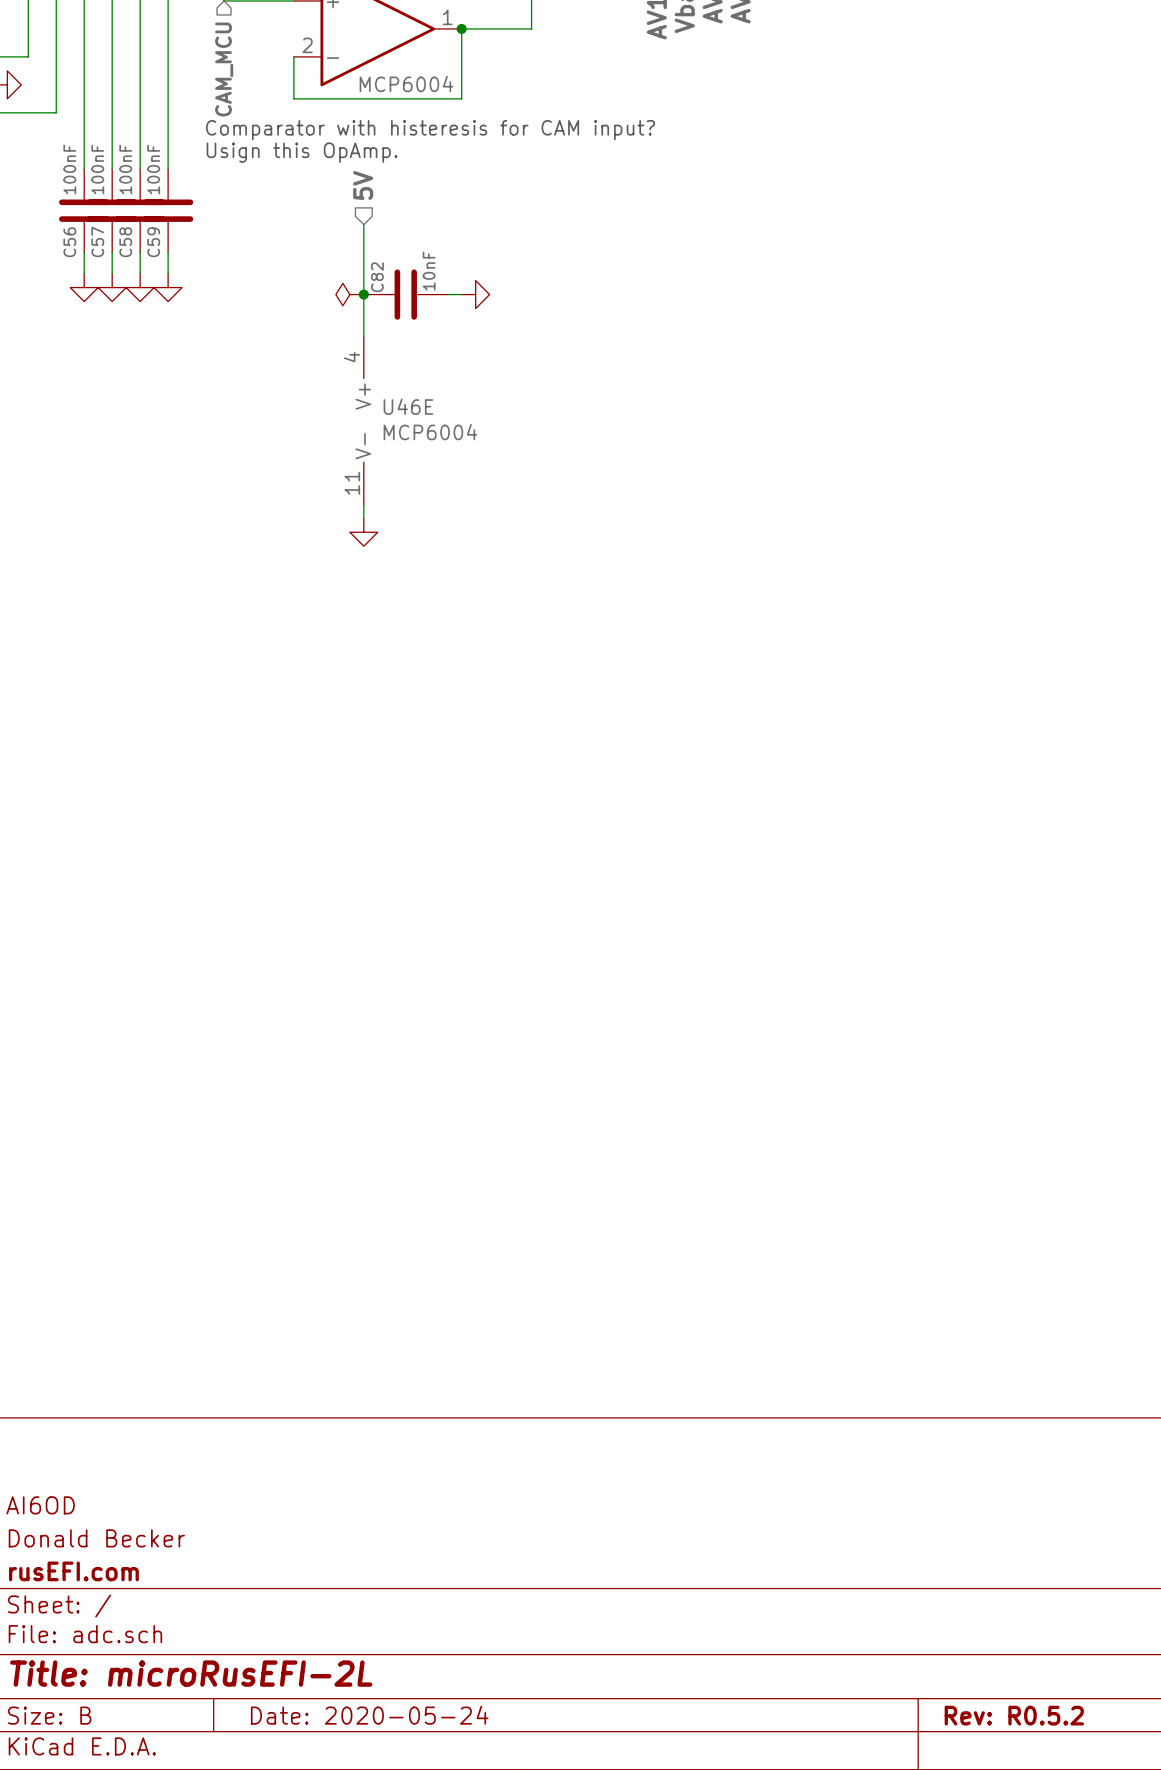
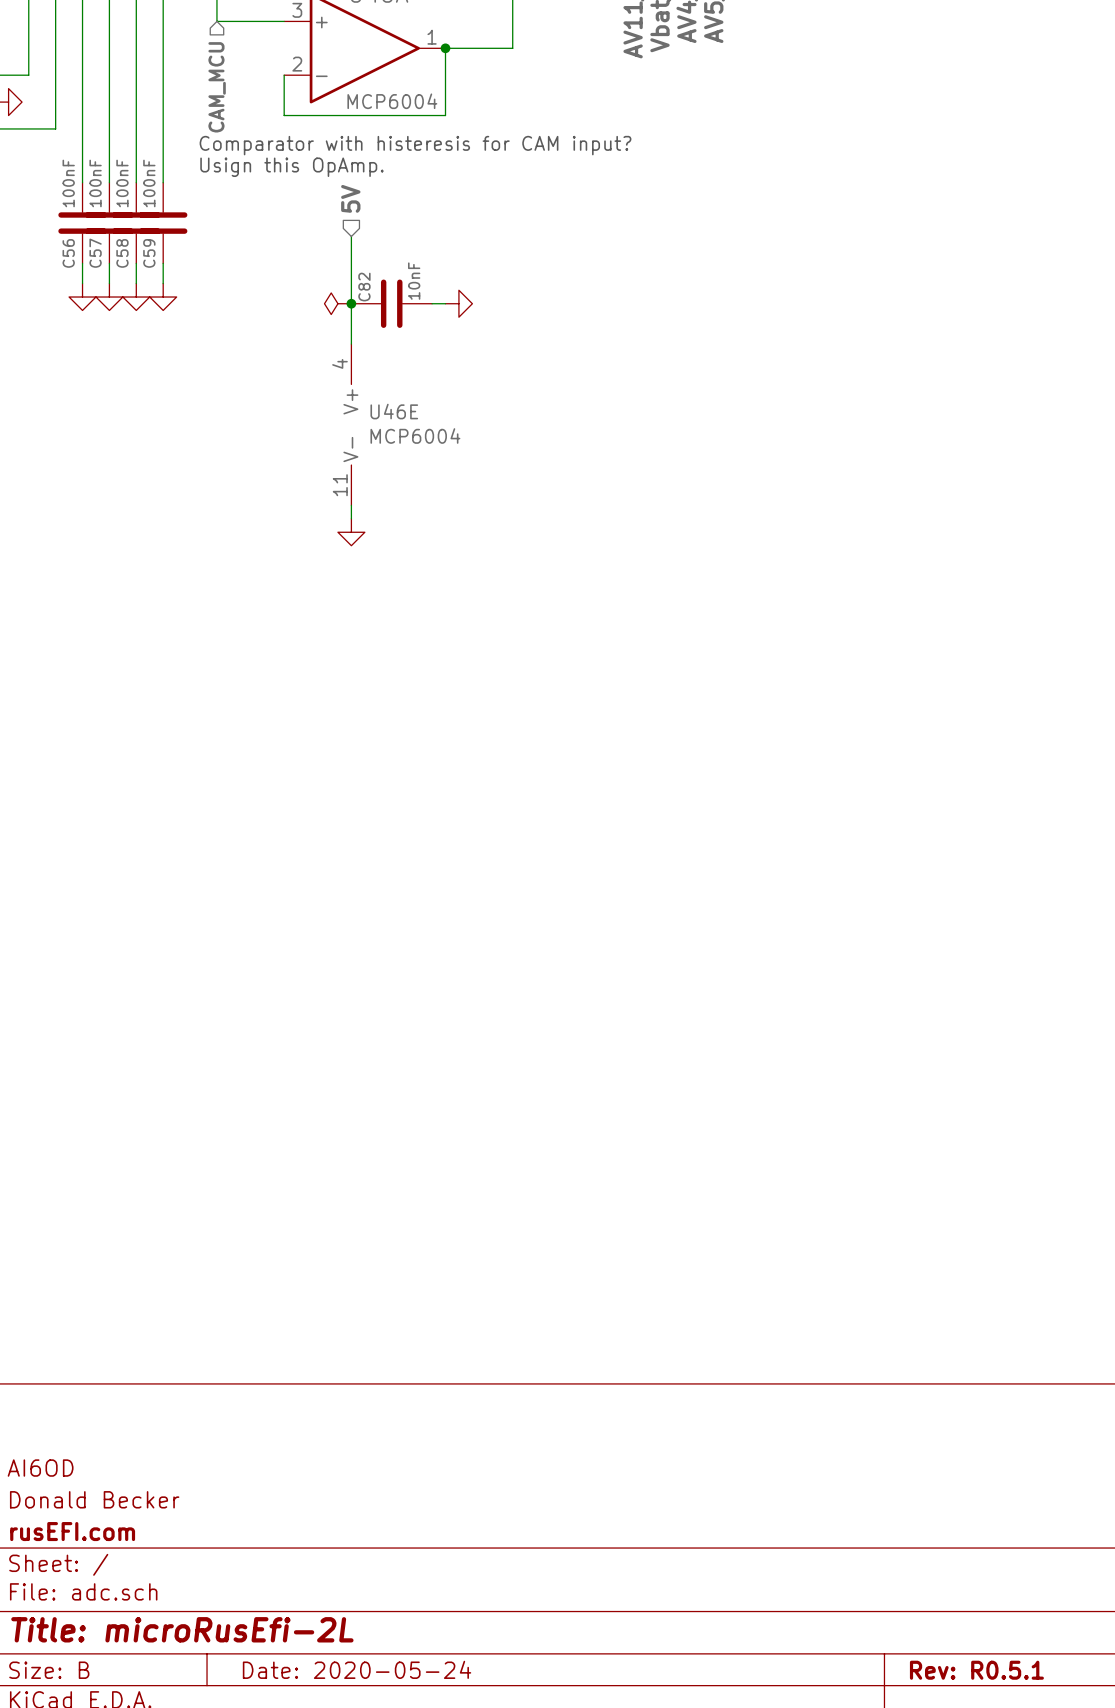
title block: Title: microRusEFI-2L (191, 1673) -> Title: microRusEfi-2L (182, 1629)
title block: Rev: R0.5.2 (1014, 1715) -> Rev: R0.5.1 (976, 1670)

